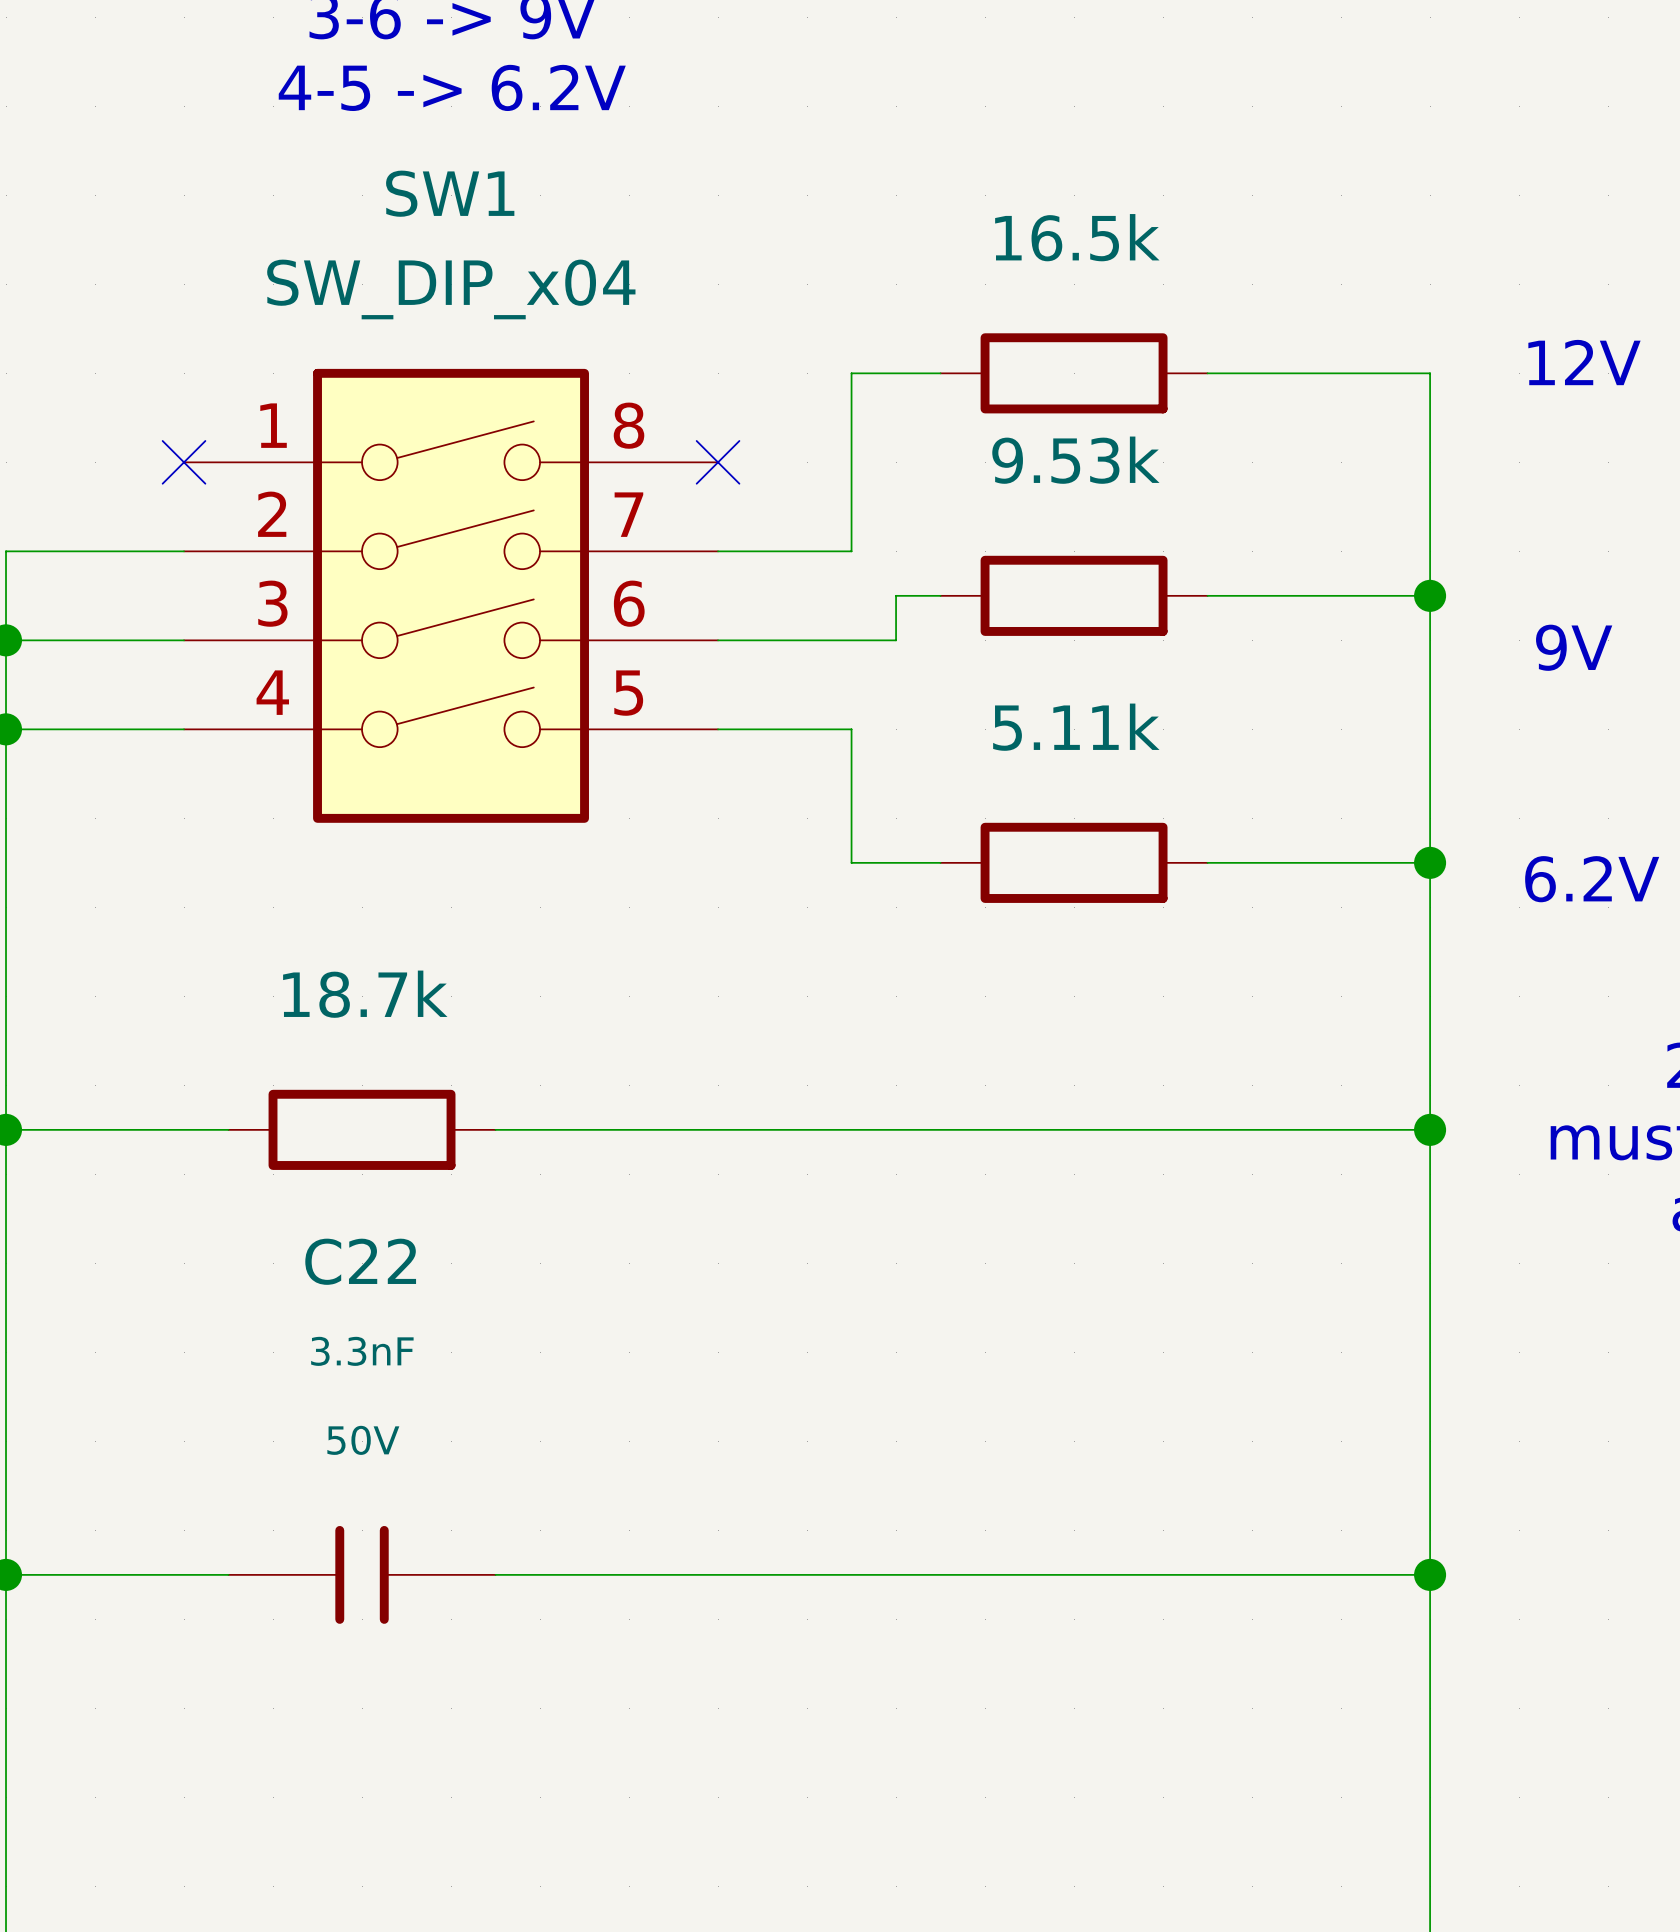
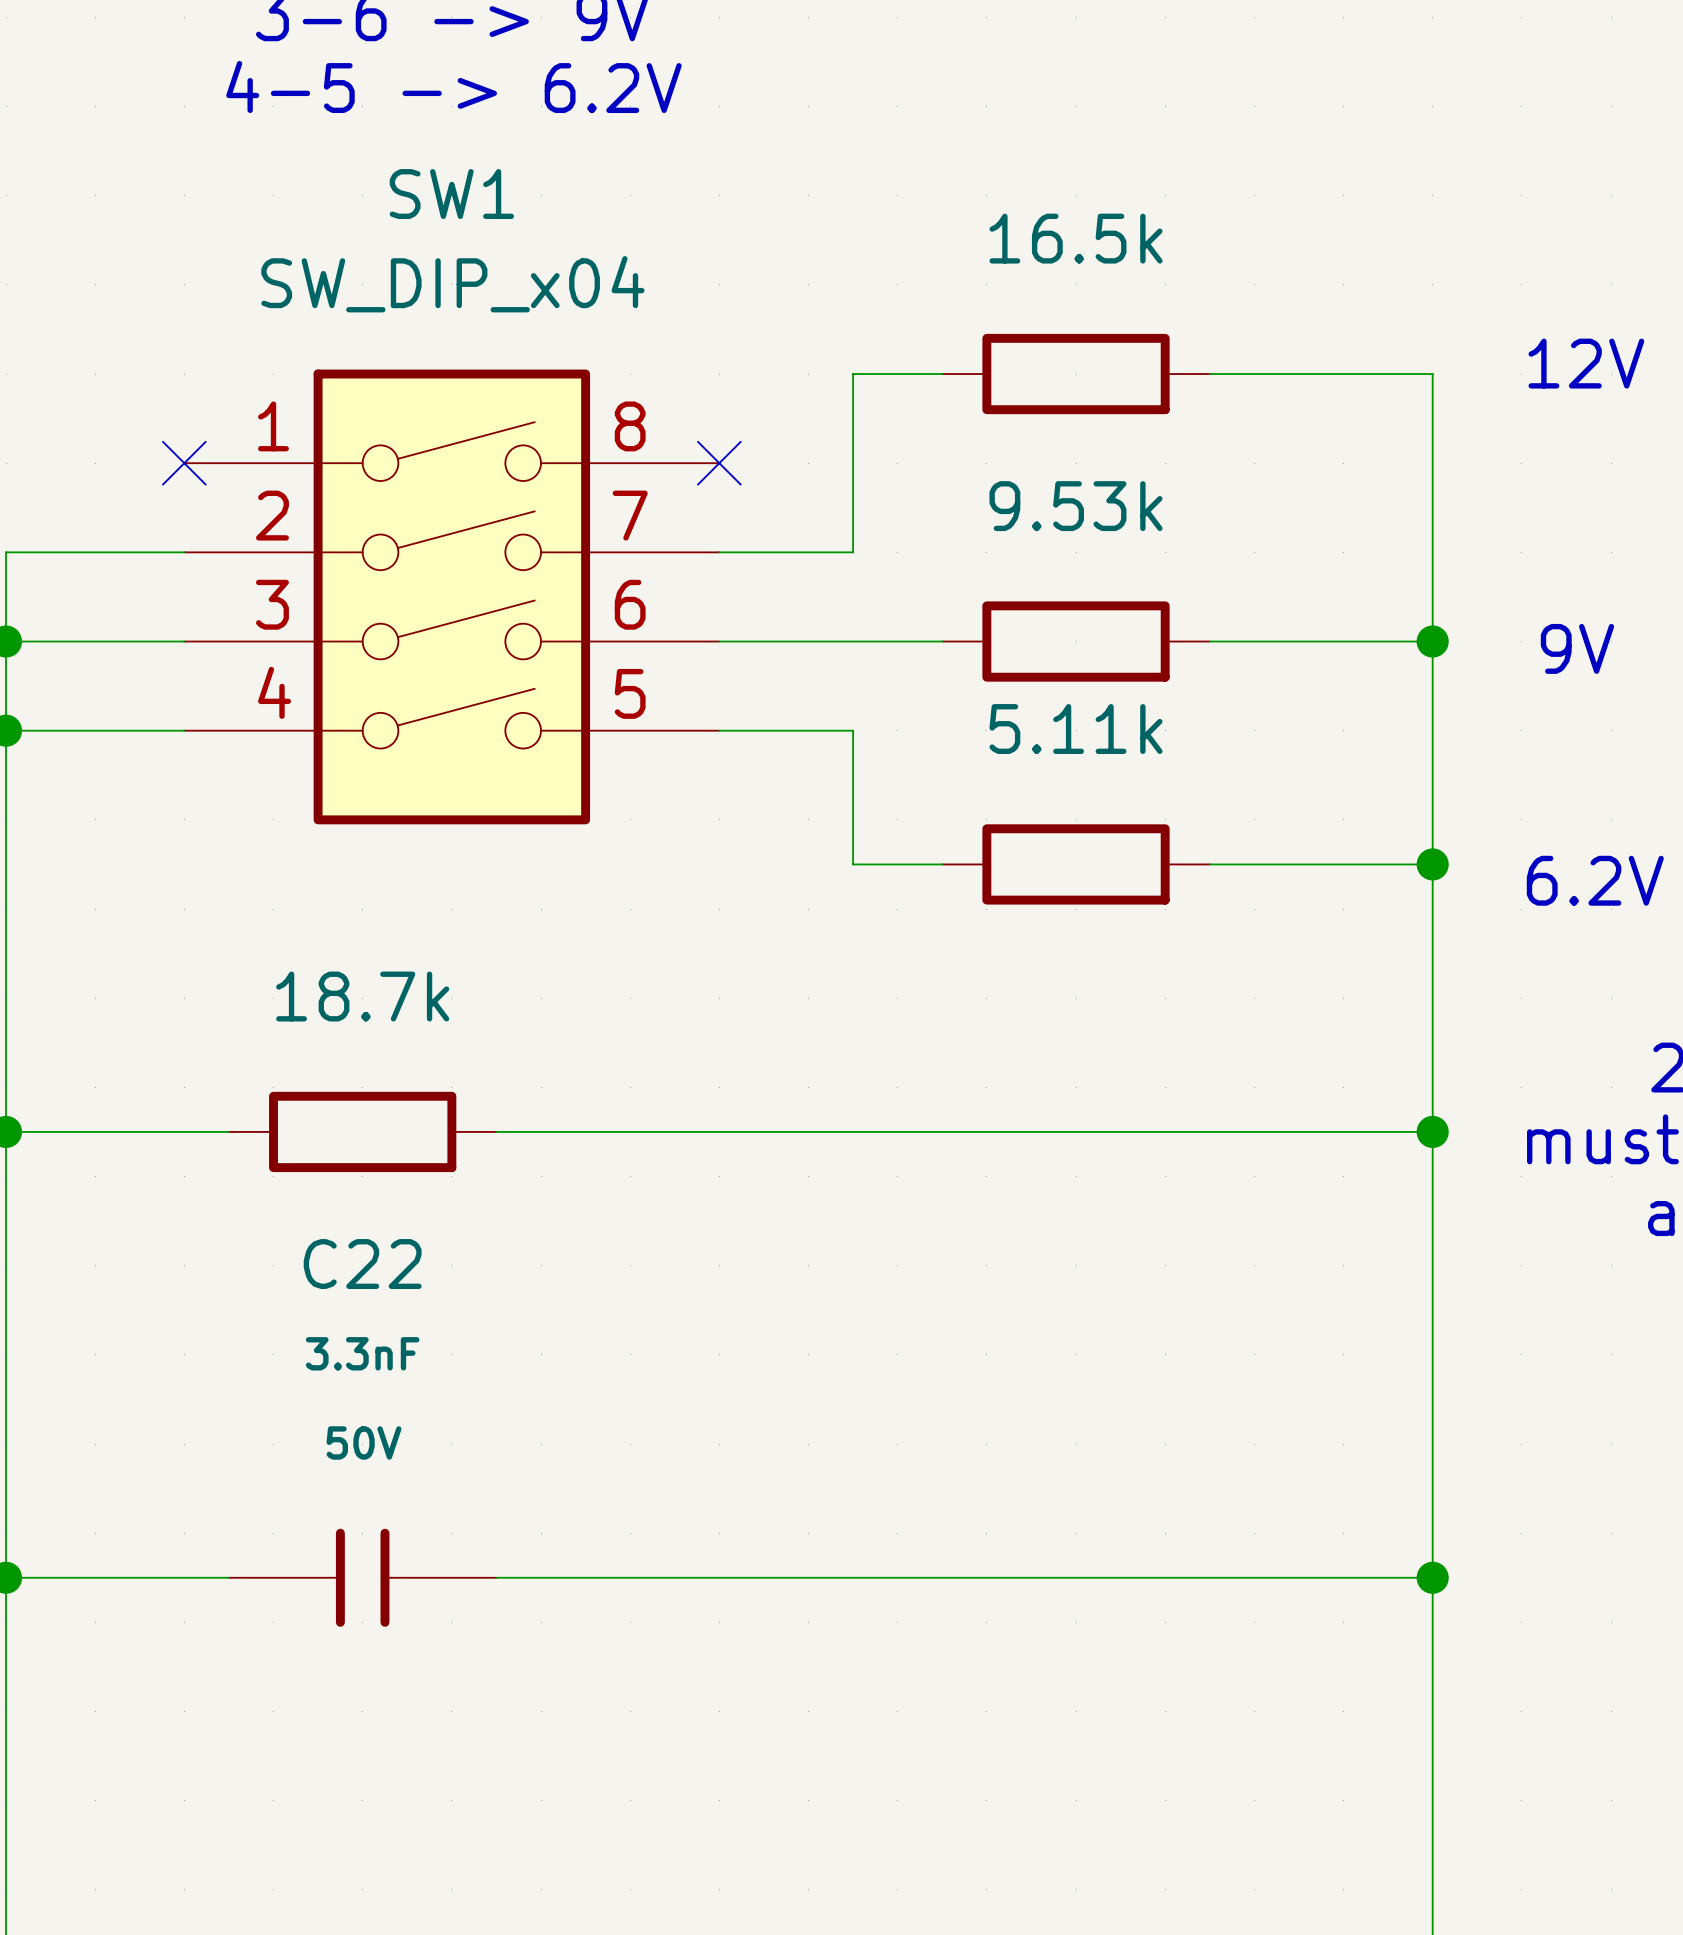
wire: (940, 595) (896, 595) (896, 640) -> (942, 641) (897, 641)
part position: (1074, 595) -> (1076, 641)
wire: (1207, 595) (1430, 595) -> (1209, 641) (1432, 641)
junction position: (1430, 595) -> (1432, 641)

